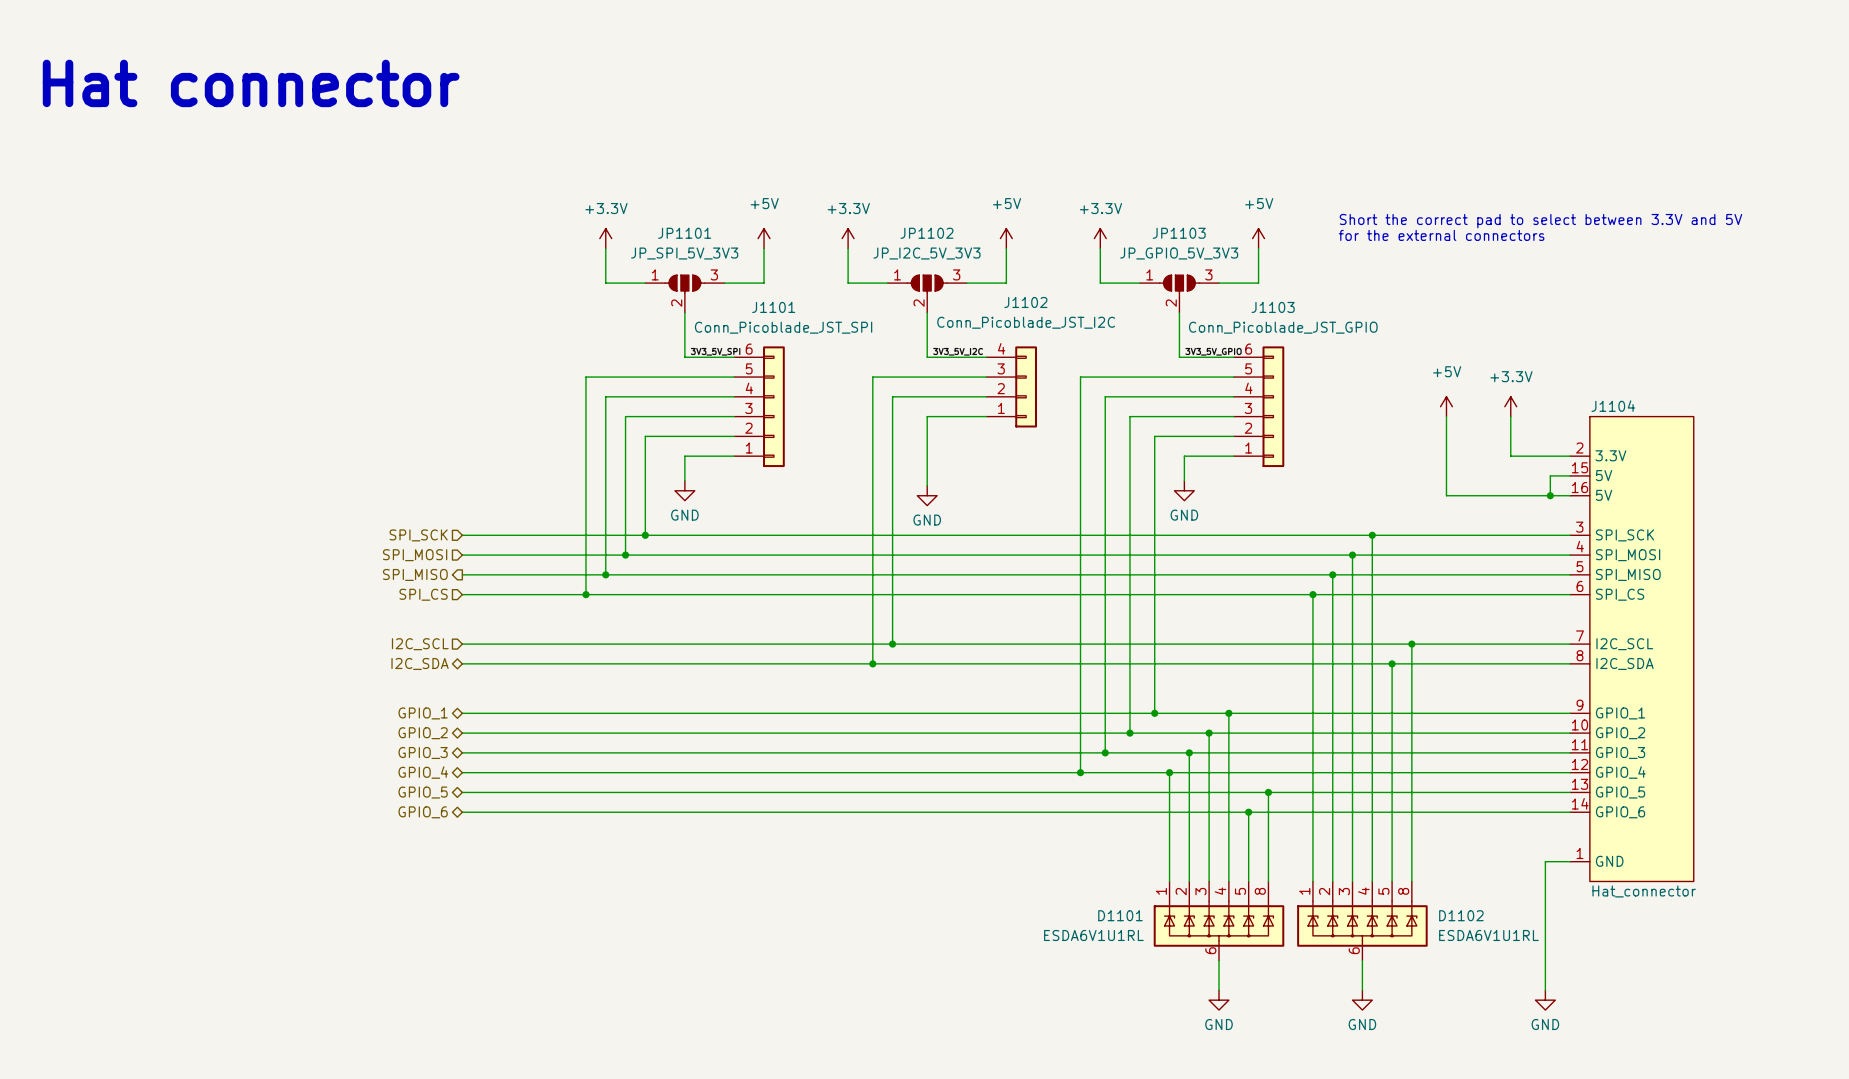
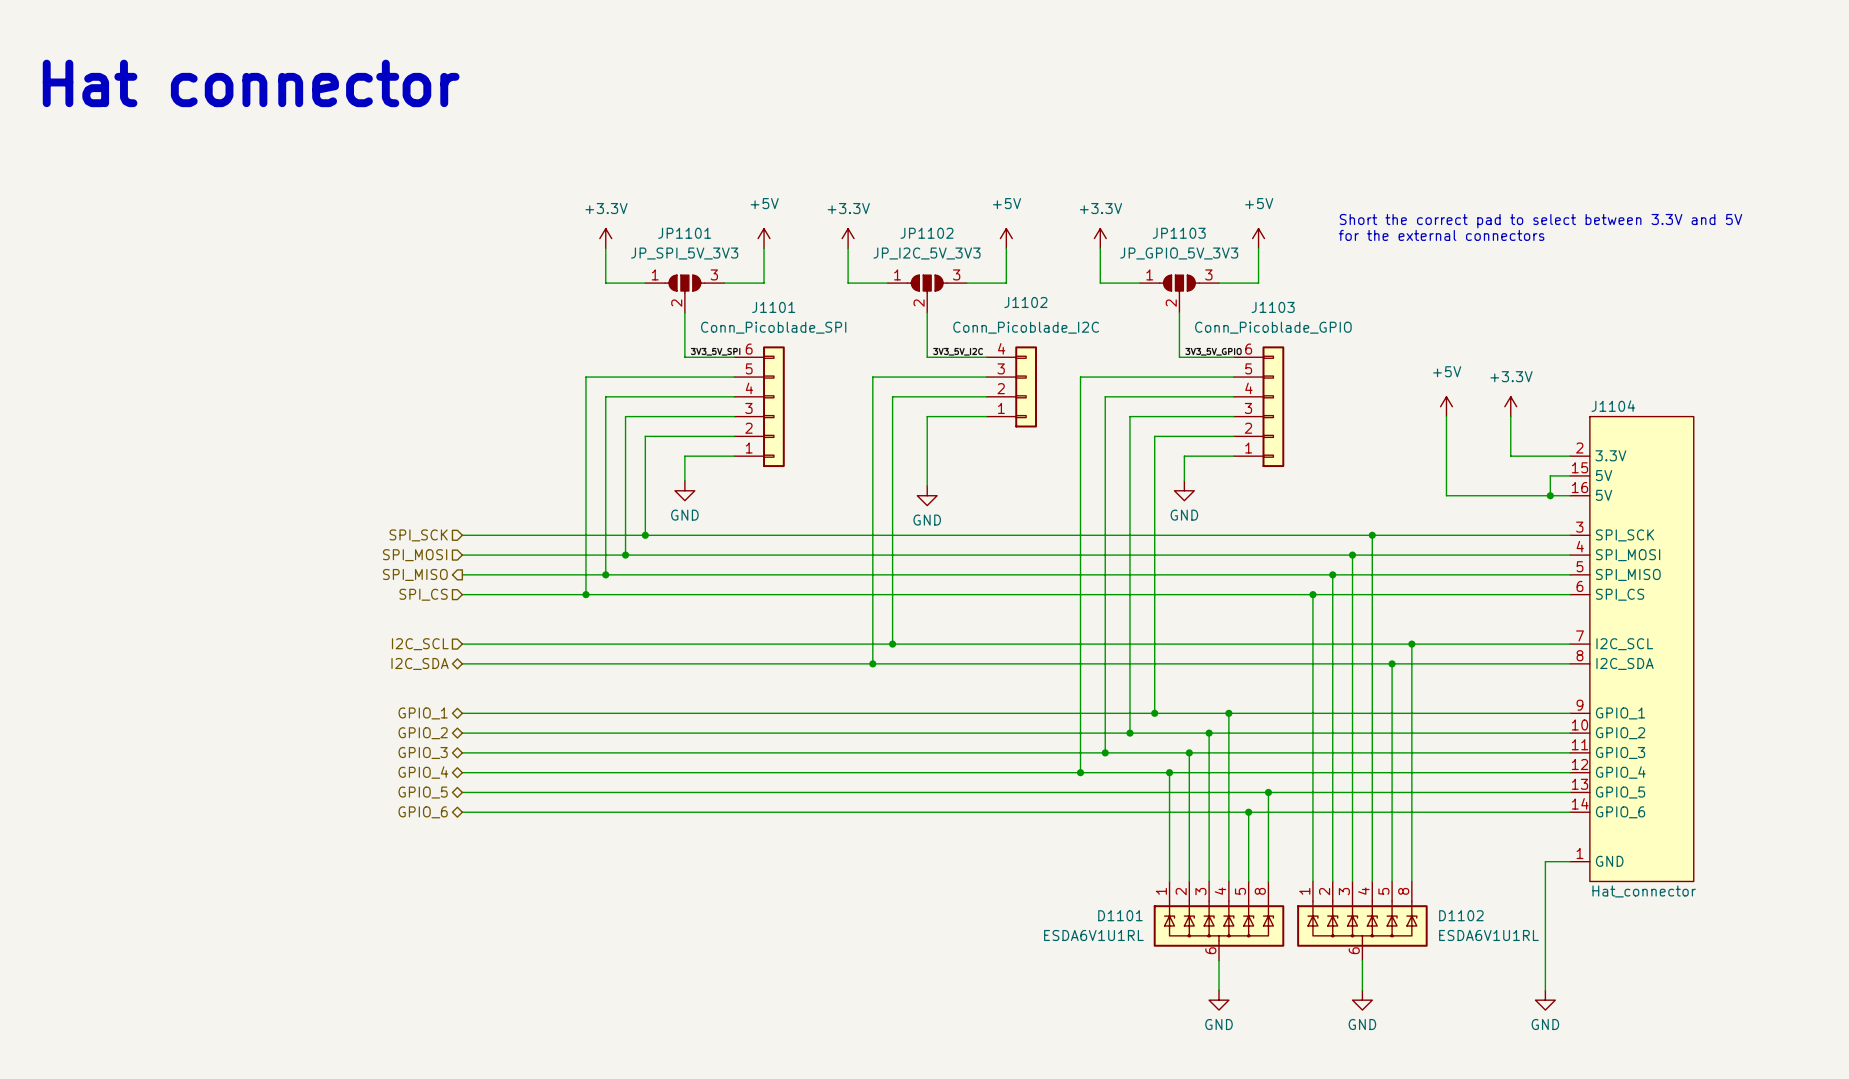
J1102 value: Conn_Picoblade_JST_I2C (1026, 322) -> Conn_Picoblade_I2C (1026, 327)
J1101 value: Conn_Picoblade_JST_SPI (783, 327) -> Conn_Picoblade_SPI (773, 327)
J1103 value: Conn_Picoblade_JST_GPIO (1283, 327) -> Conn_Picoblade_GPIO (1273, 327)

